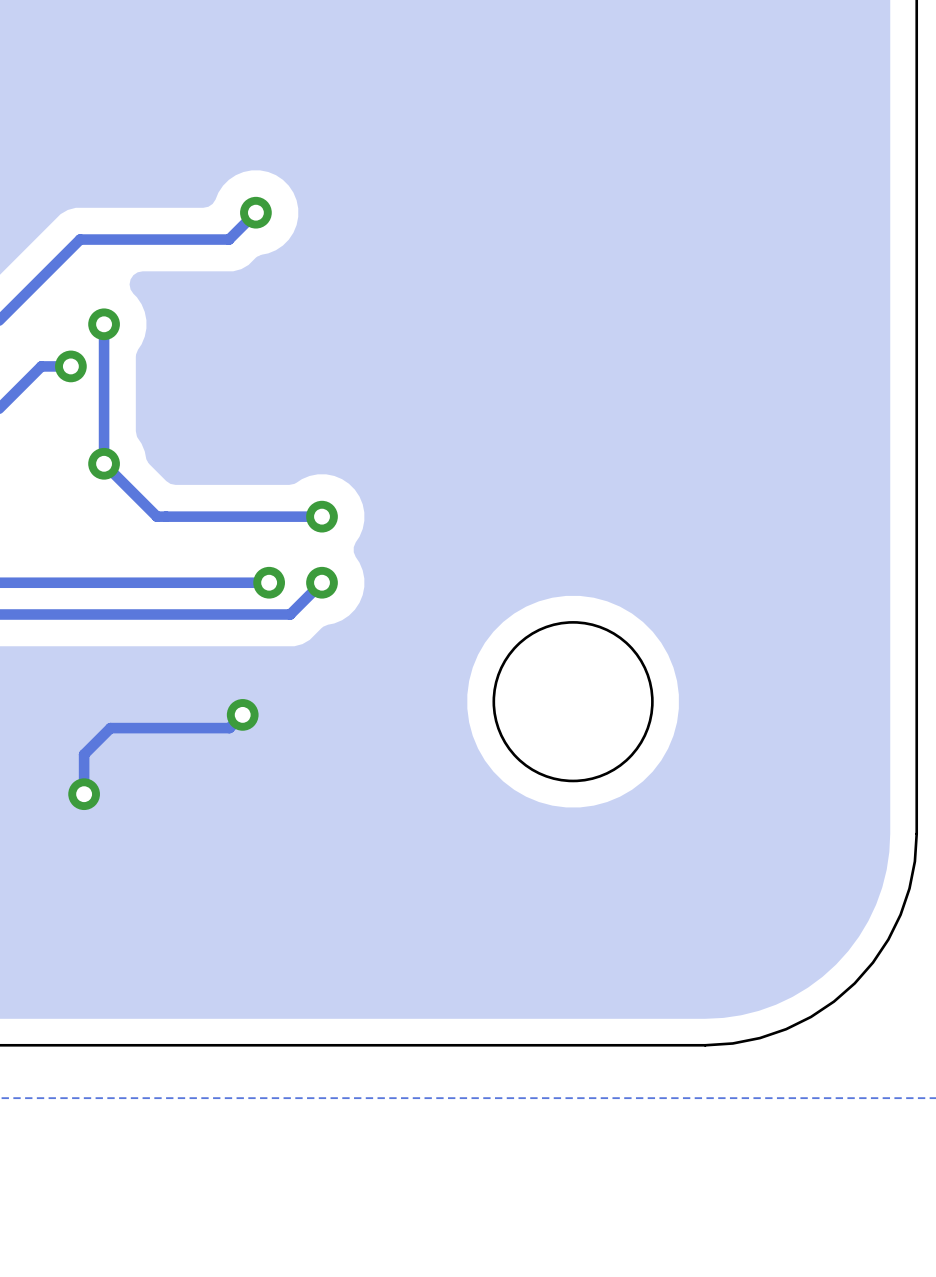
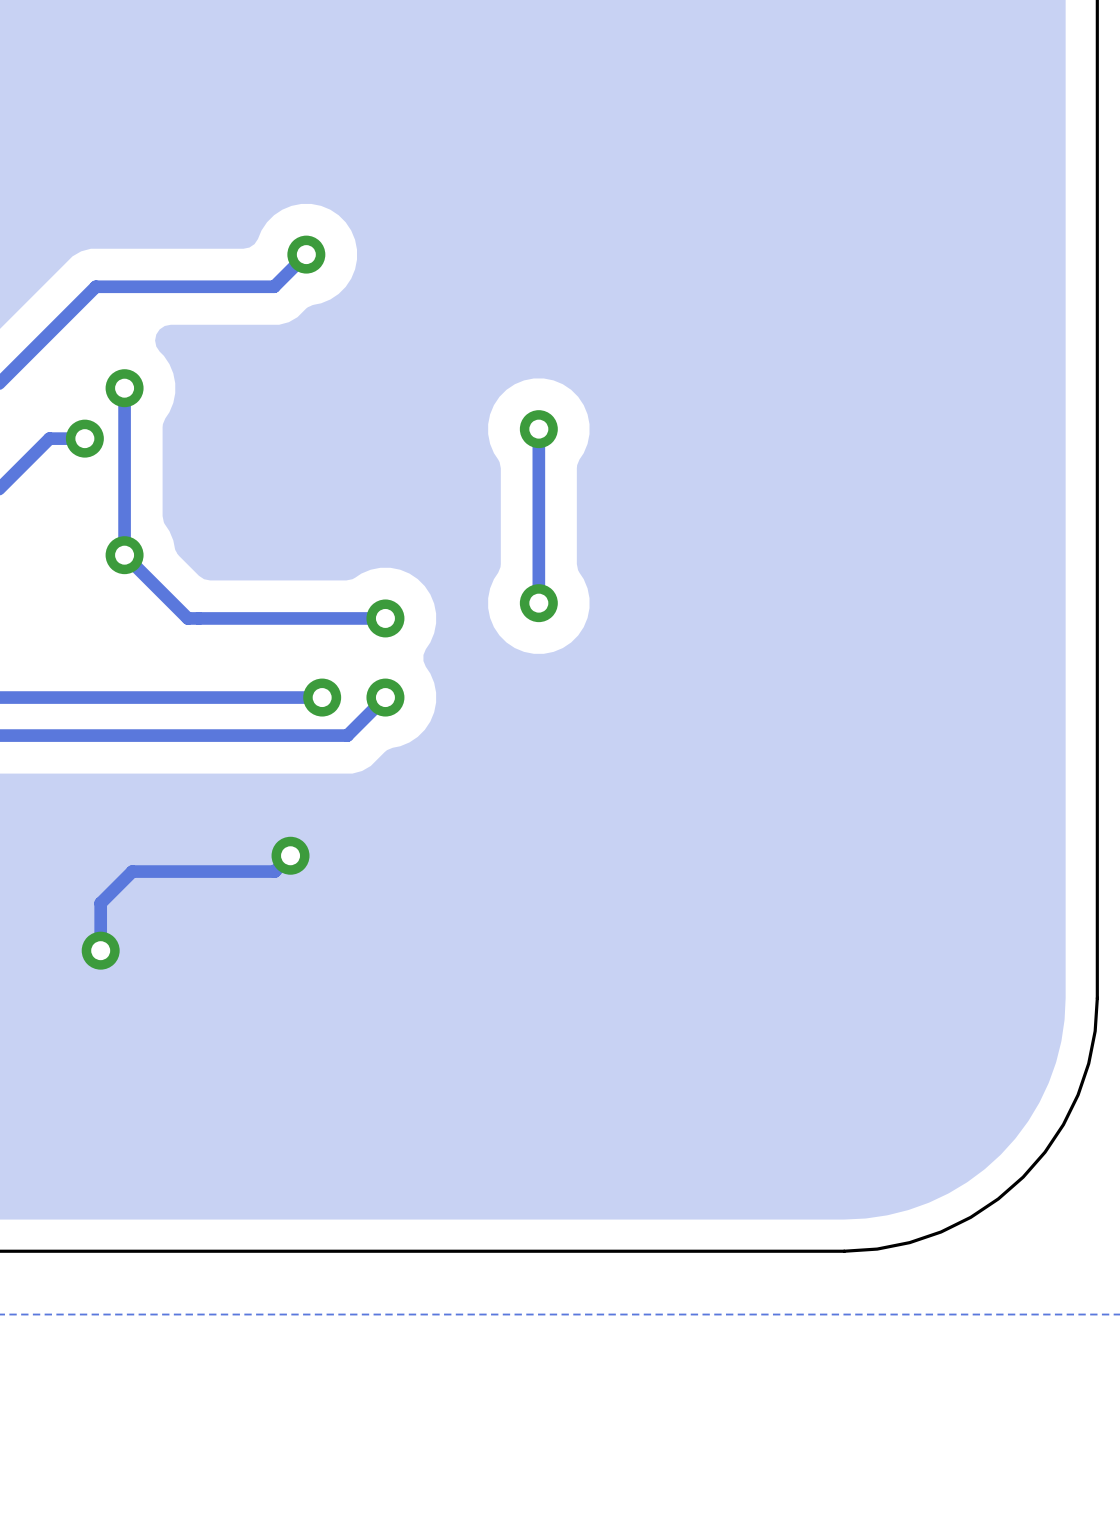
track: none -> (538, 429) (538, 603)
via: none -> (538, 429)
via: none -> (538, 603)
round board edge: [492, 621, 654, 783] -> none

